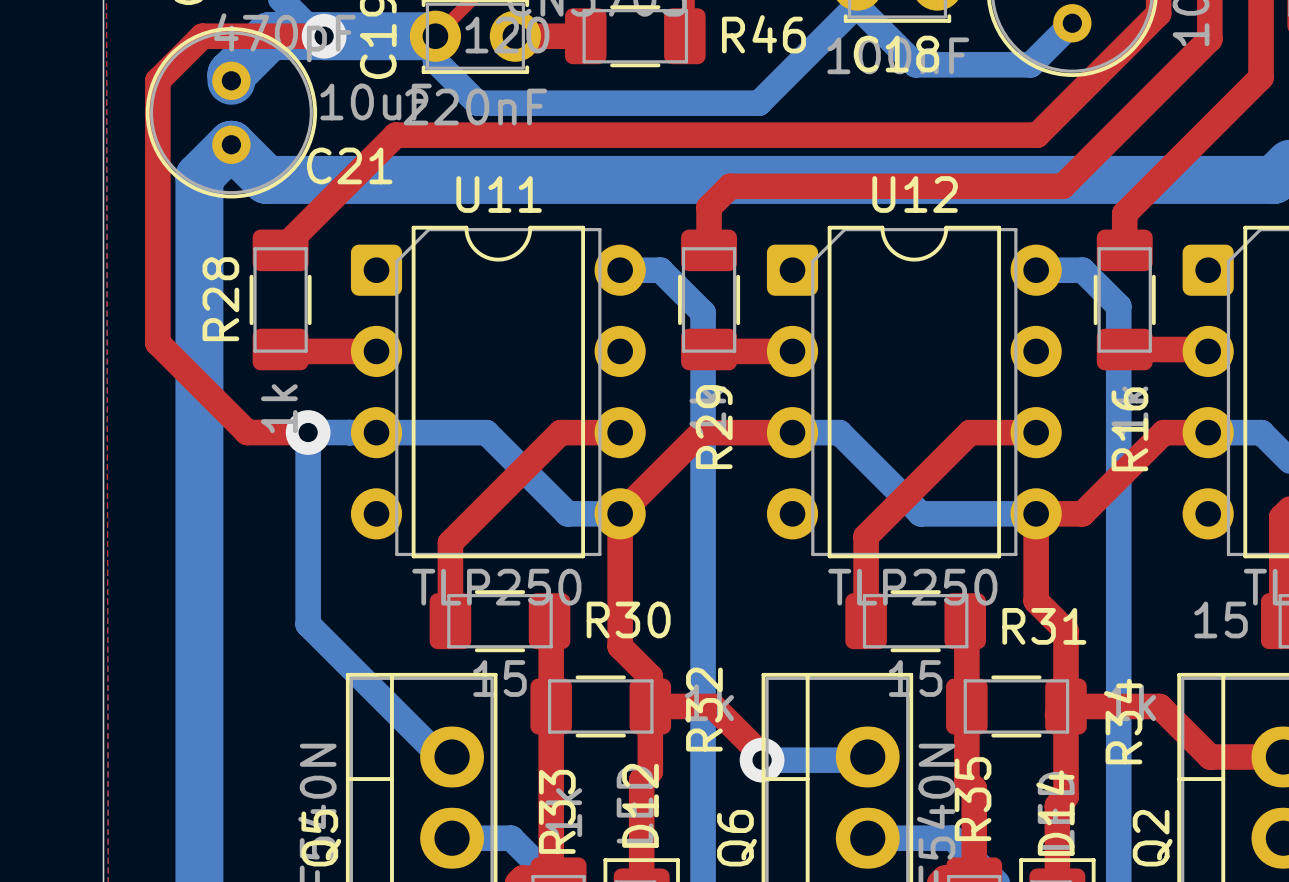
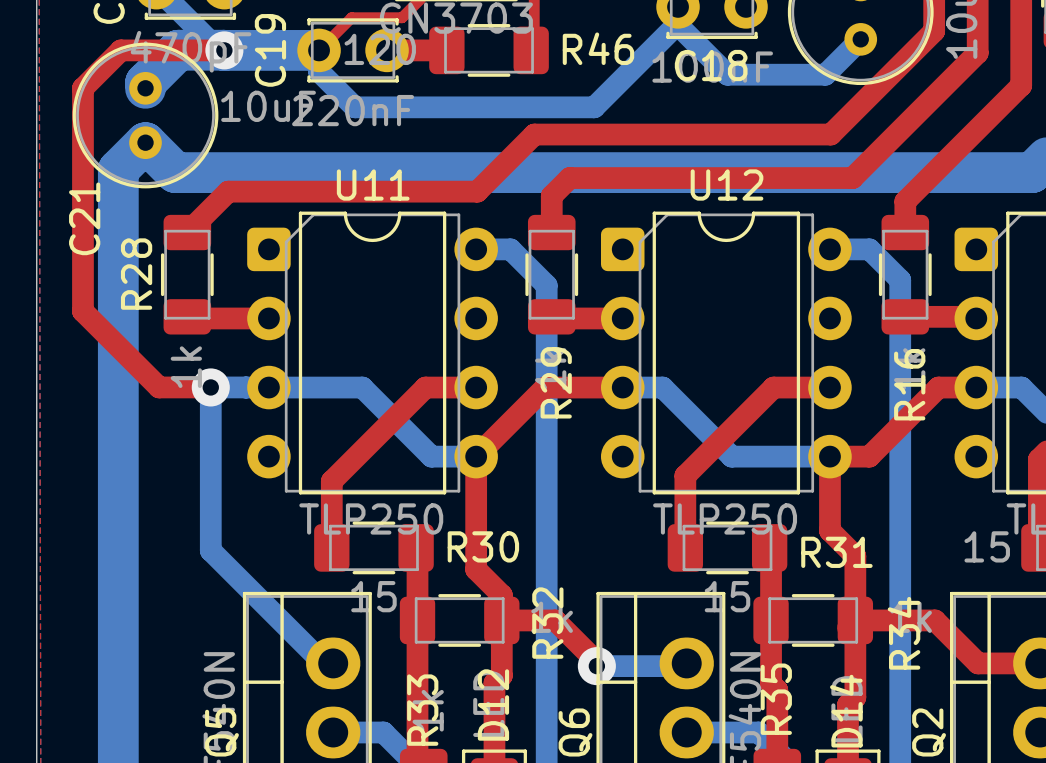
top track: (688, 135) (395, 135) (328, 202) -> (534, 134) (477, 191) (228, 191)
C21 name rotation: 0° (349, 165) -> 90° counterclockwise (84, 218)
C21 name position: C21 (349, 165) -> C21 (84, 218)

